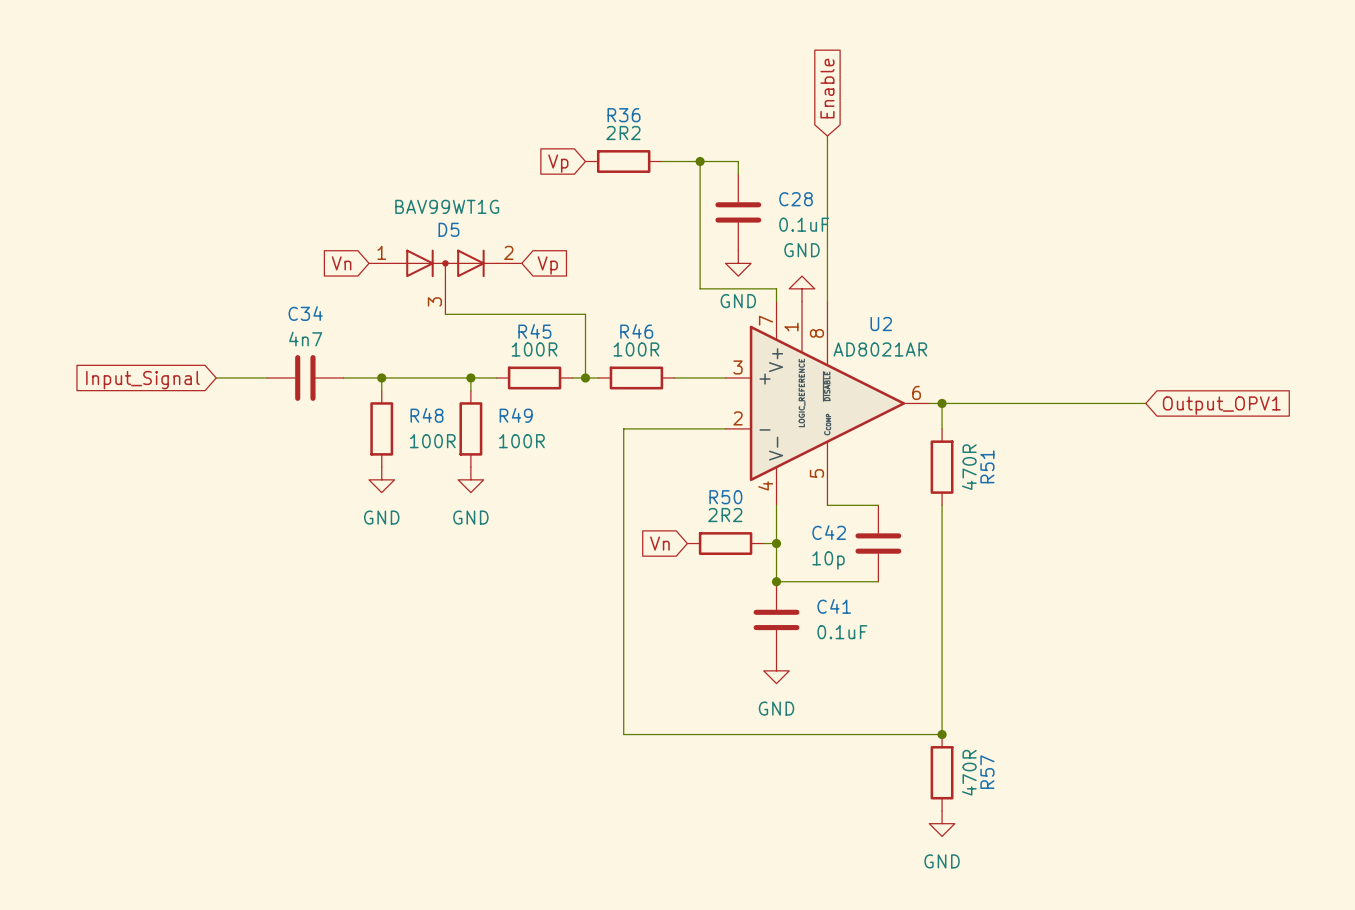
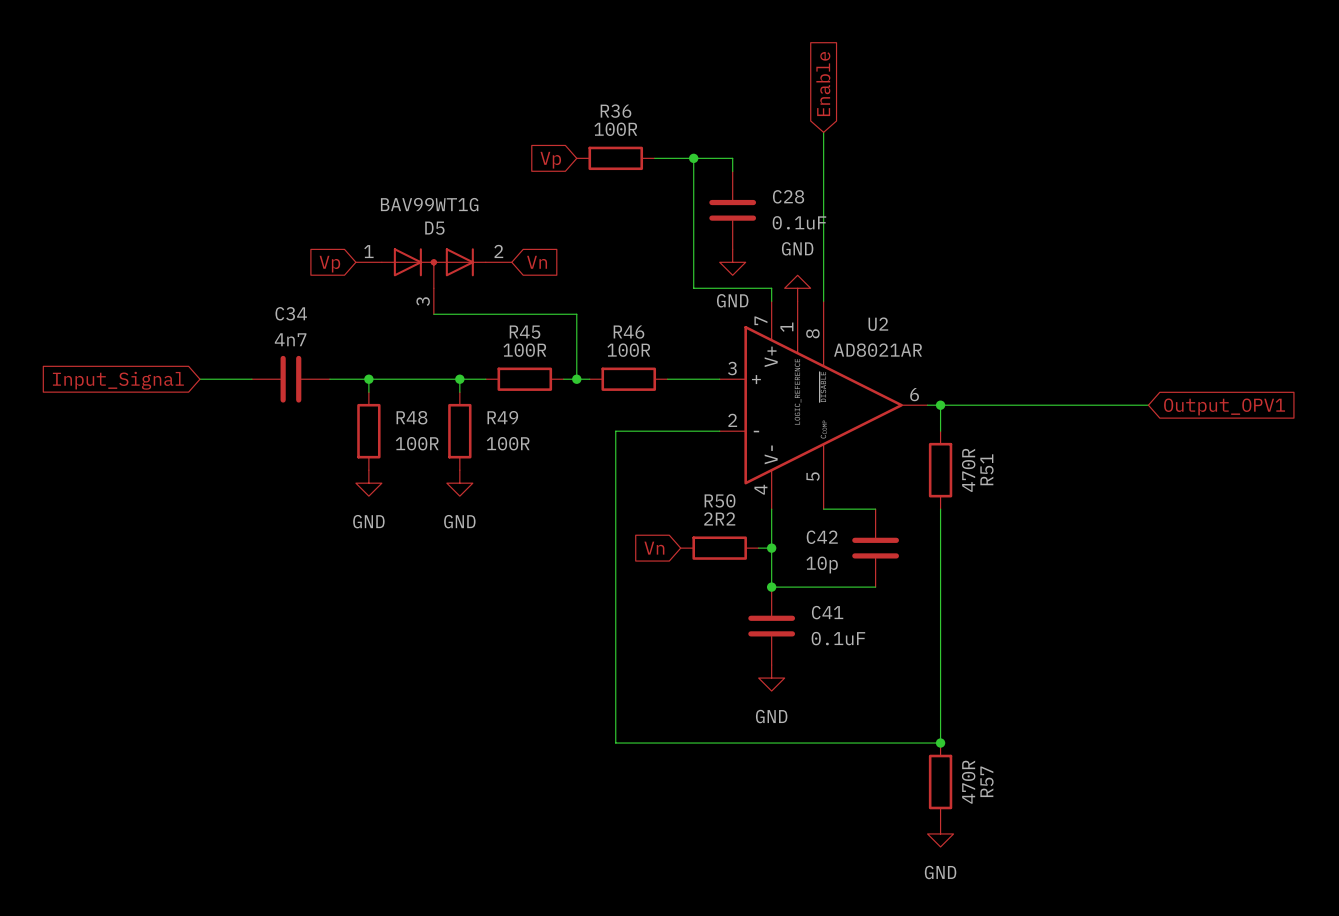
R36 value: 2R2 (623, 133) -> 100R (615, 129)
global label: Vn (341, 263) -> Vp (329, 264)
global label: Vp (547, 265) -> Vn (537, 262)

